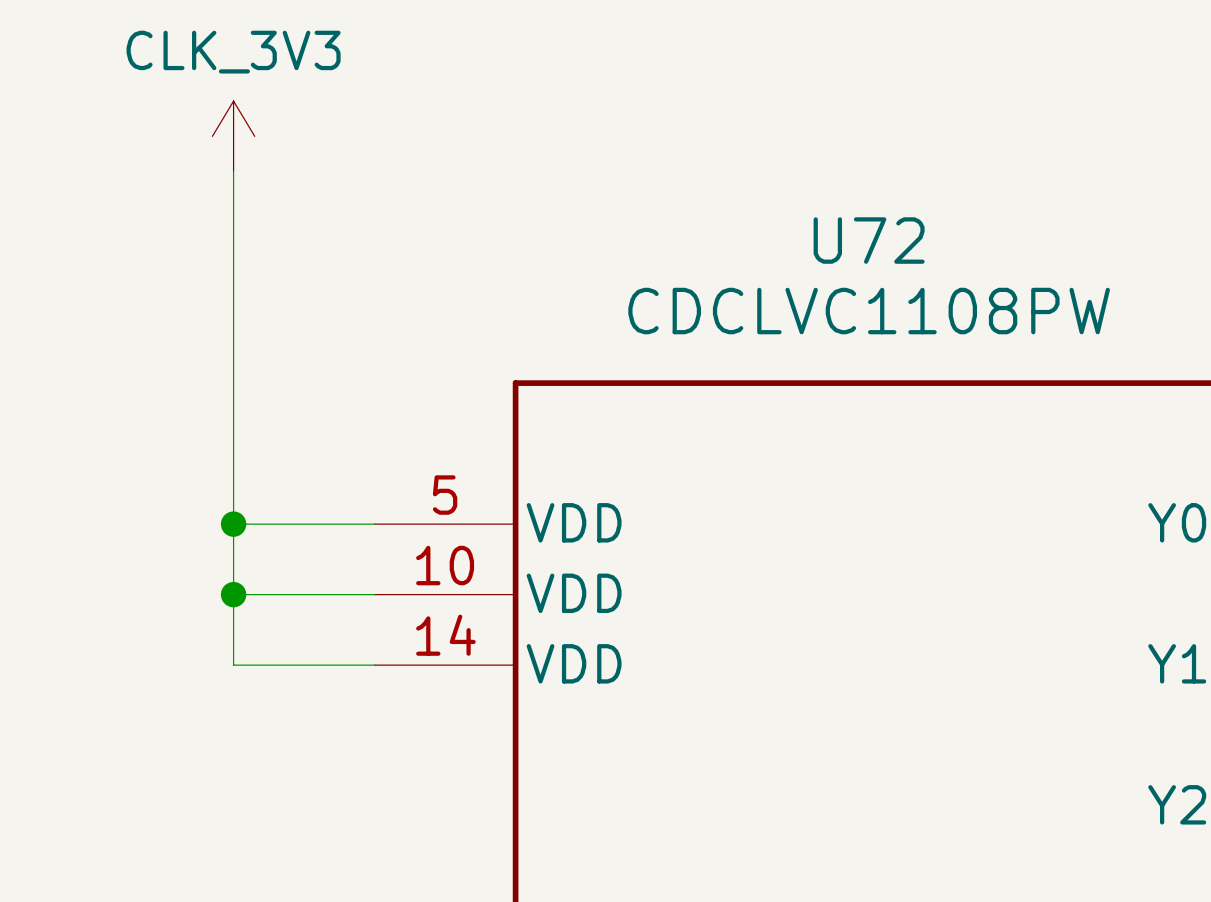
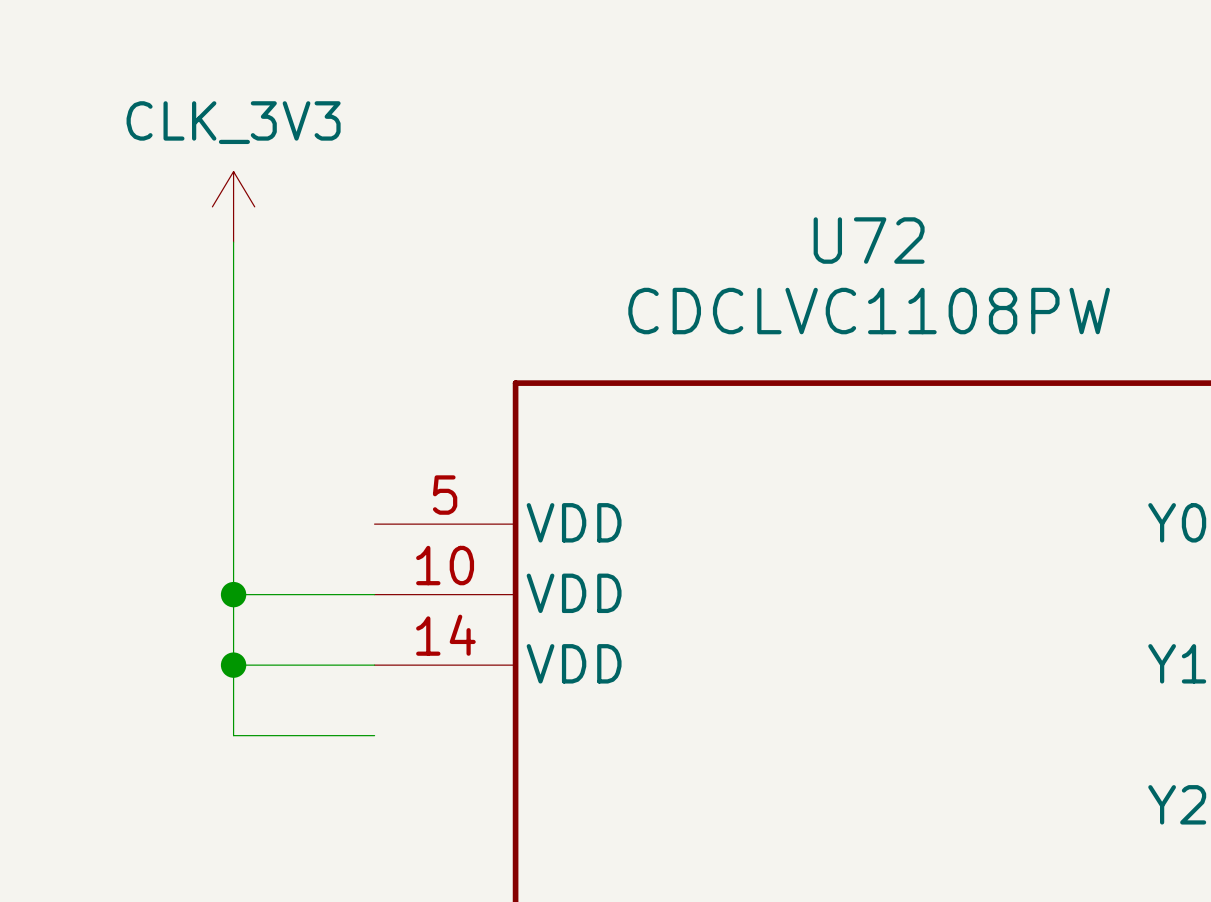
power symbol position: CLK_3V3 (233, 136) -> CLK_3V3 (233, 206)
wire: (233, 524) (374, 524) -> none
junction position: (233, 524) -> (233, 665)
wire: none -> (233, 665) (233, 735) (374, 735)

